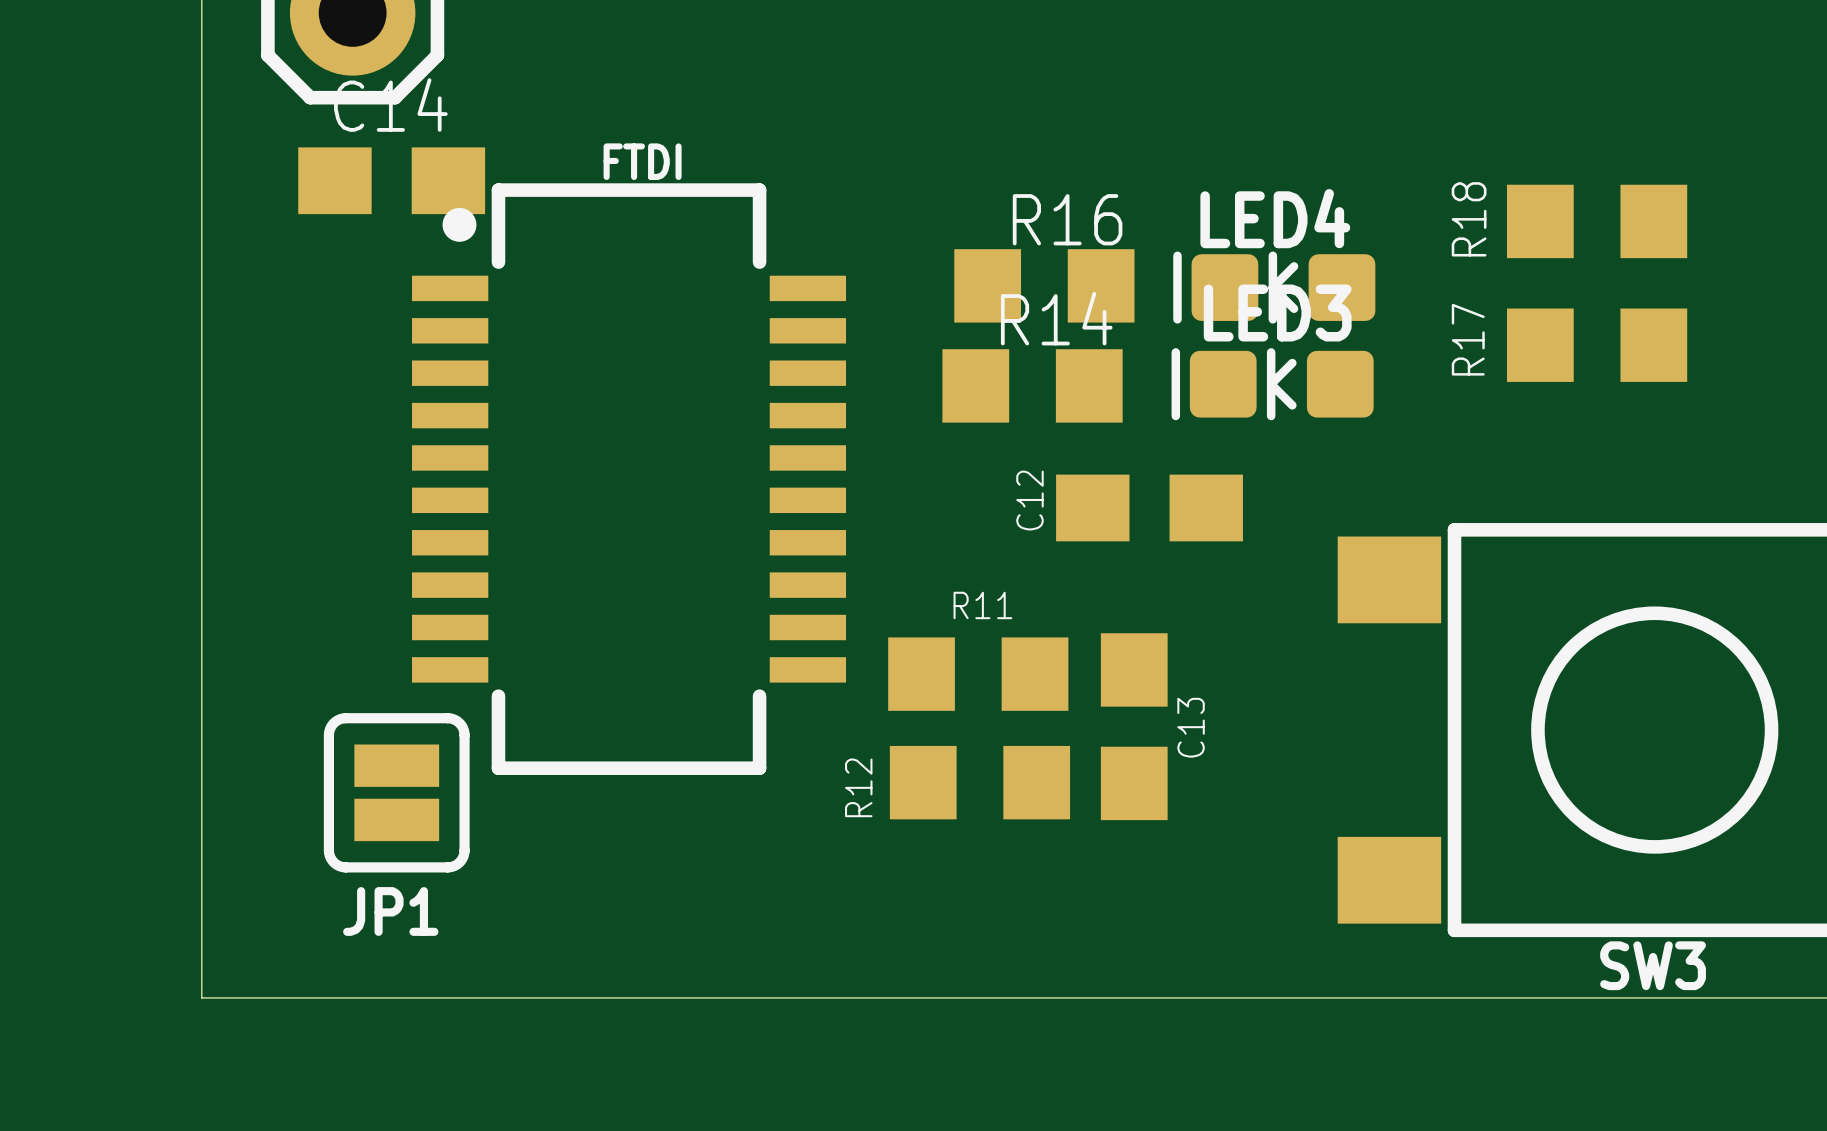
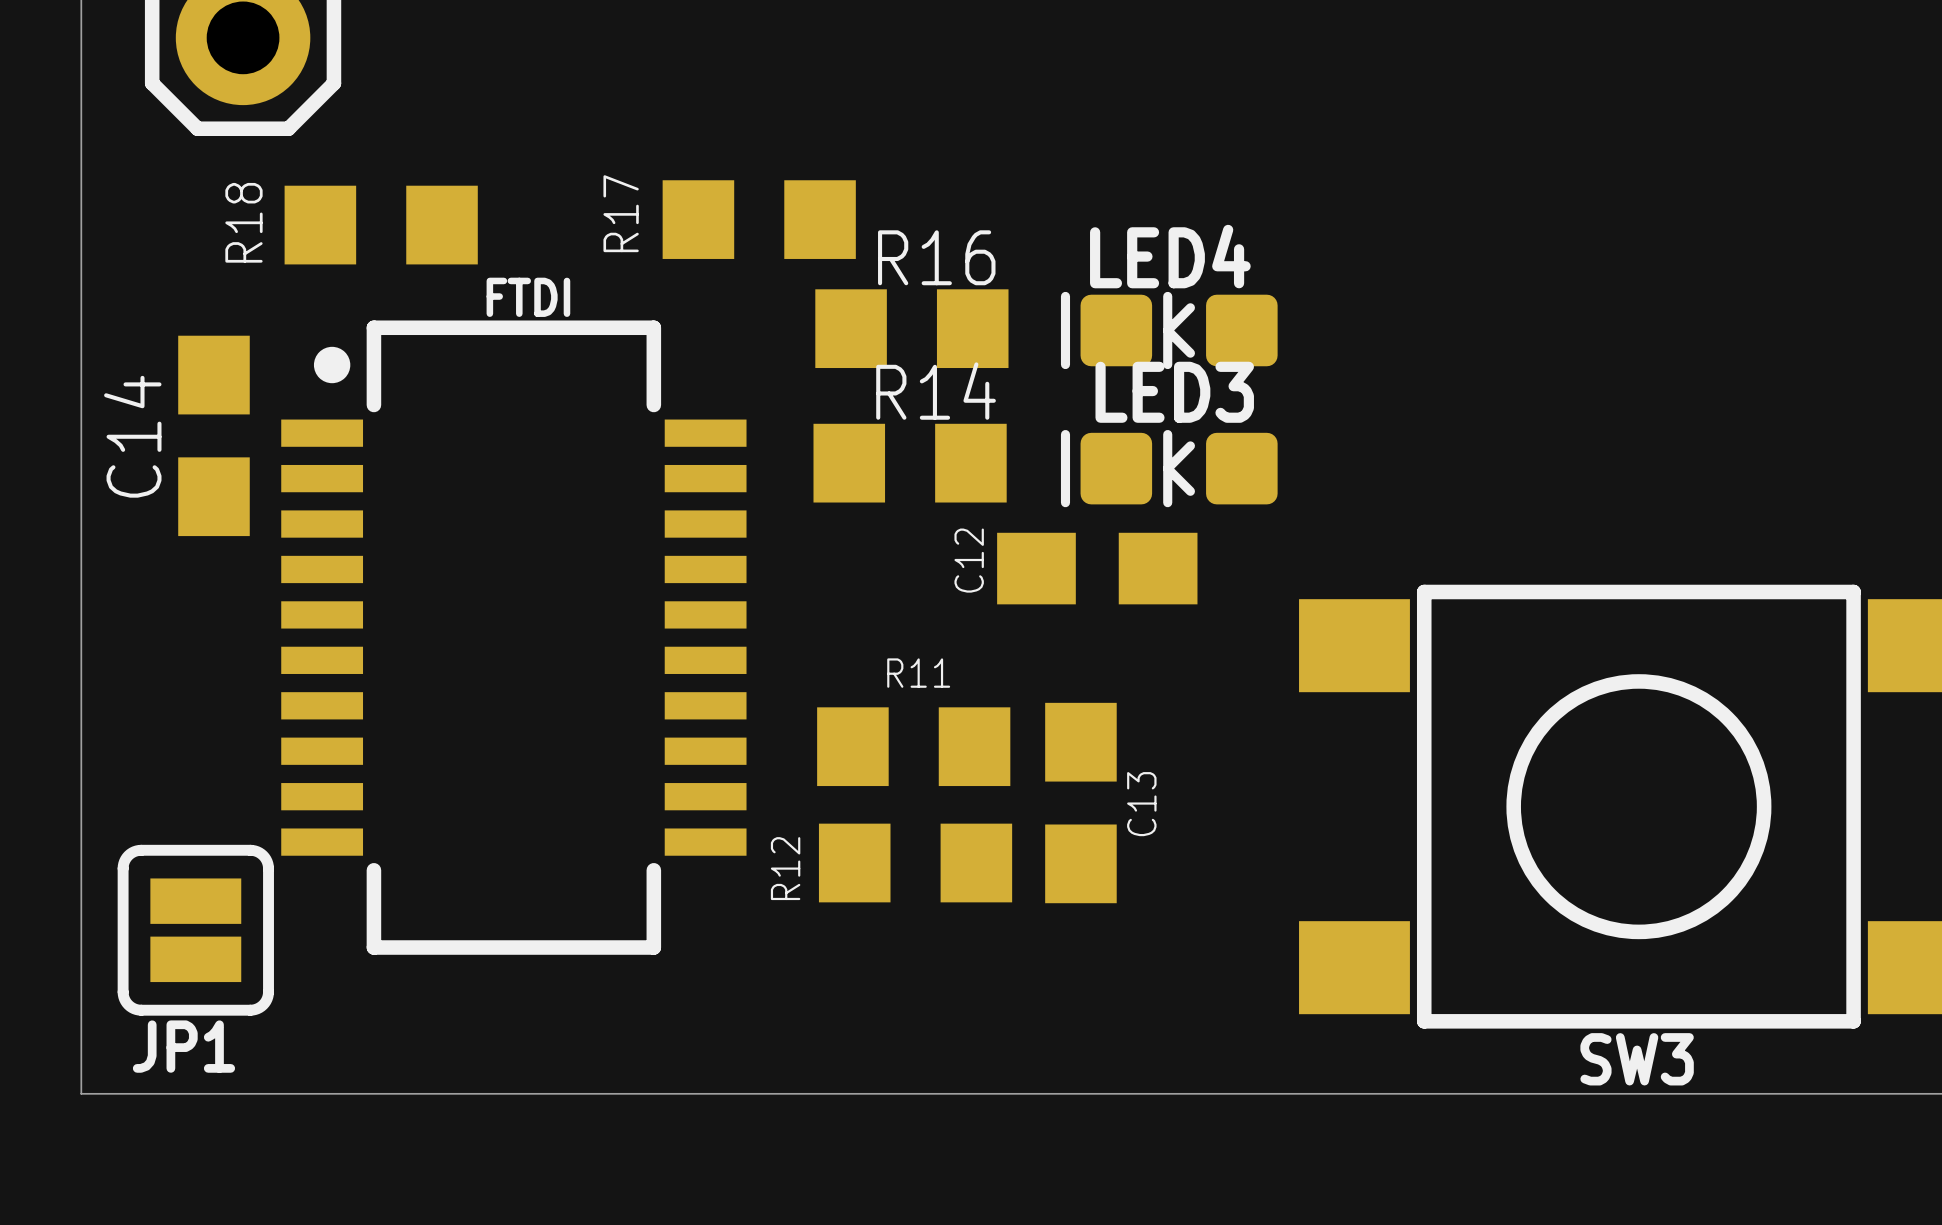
C14 rotation: 0° (391, 180) -> 90° clockwise (213, 435)
C14 position: (391, 180) -> (213, 435)
R18 position: (1597, 221) -> (381, 225)
R16 position: (1044, 285) -> (911, 328)
LED4 position: (1274, 287) -> (1169, 330)
R17 position: (1597, 345) -> (759, 219)
LED3 position: (1272, 384) -> (1169, 468)
R14 position: (1032, 385) -> (910, 463)
FTDI position: (629, 479) -> (513, 637)
JP1 position: (396, 792) -> (195, 930)
JP1 name position: JP1 (390, 911) -> JP1 (183, 1046)

